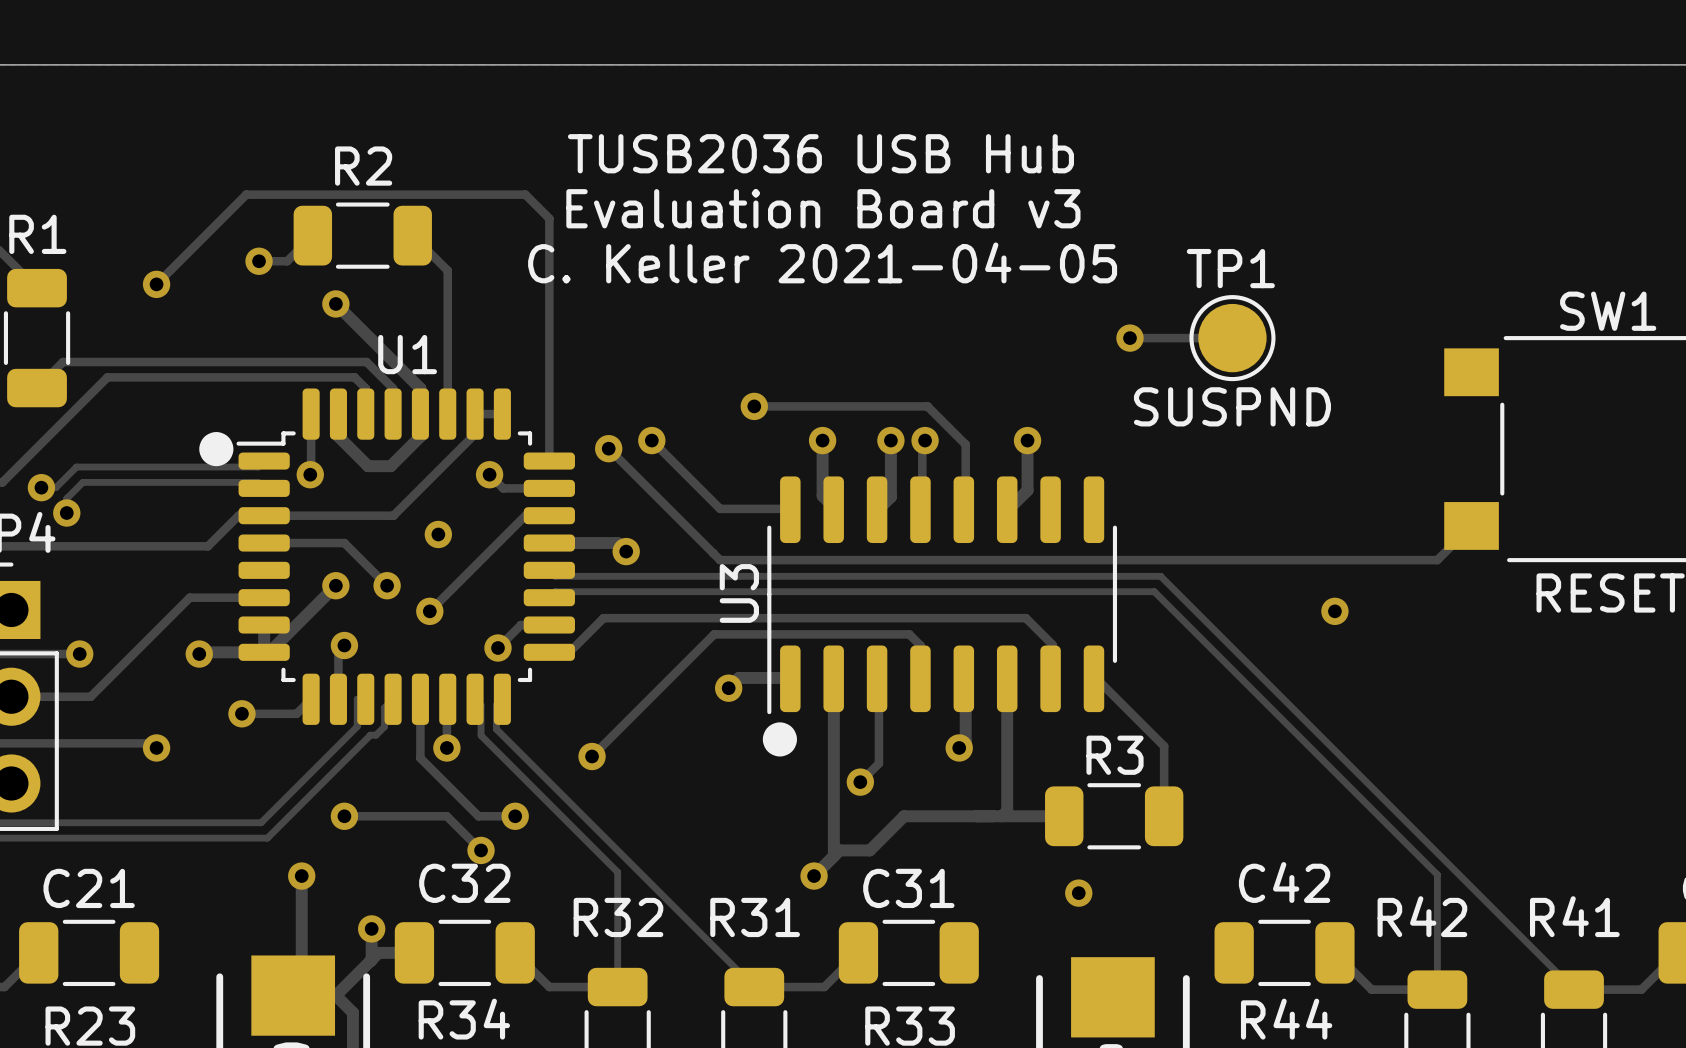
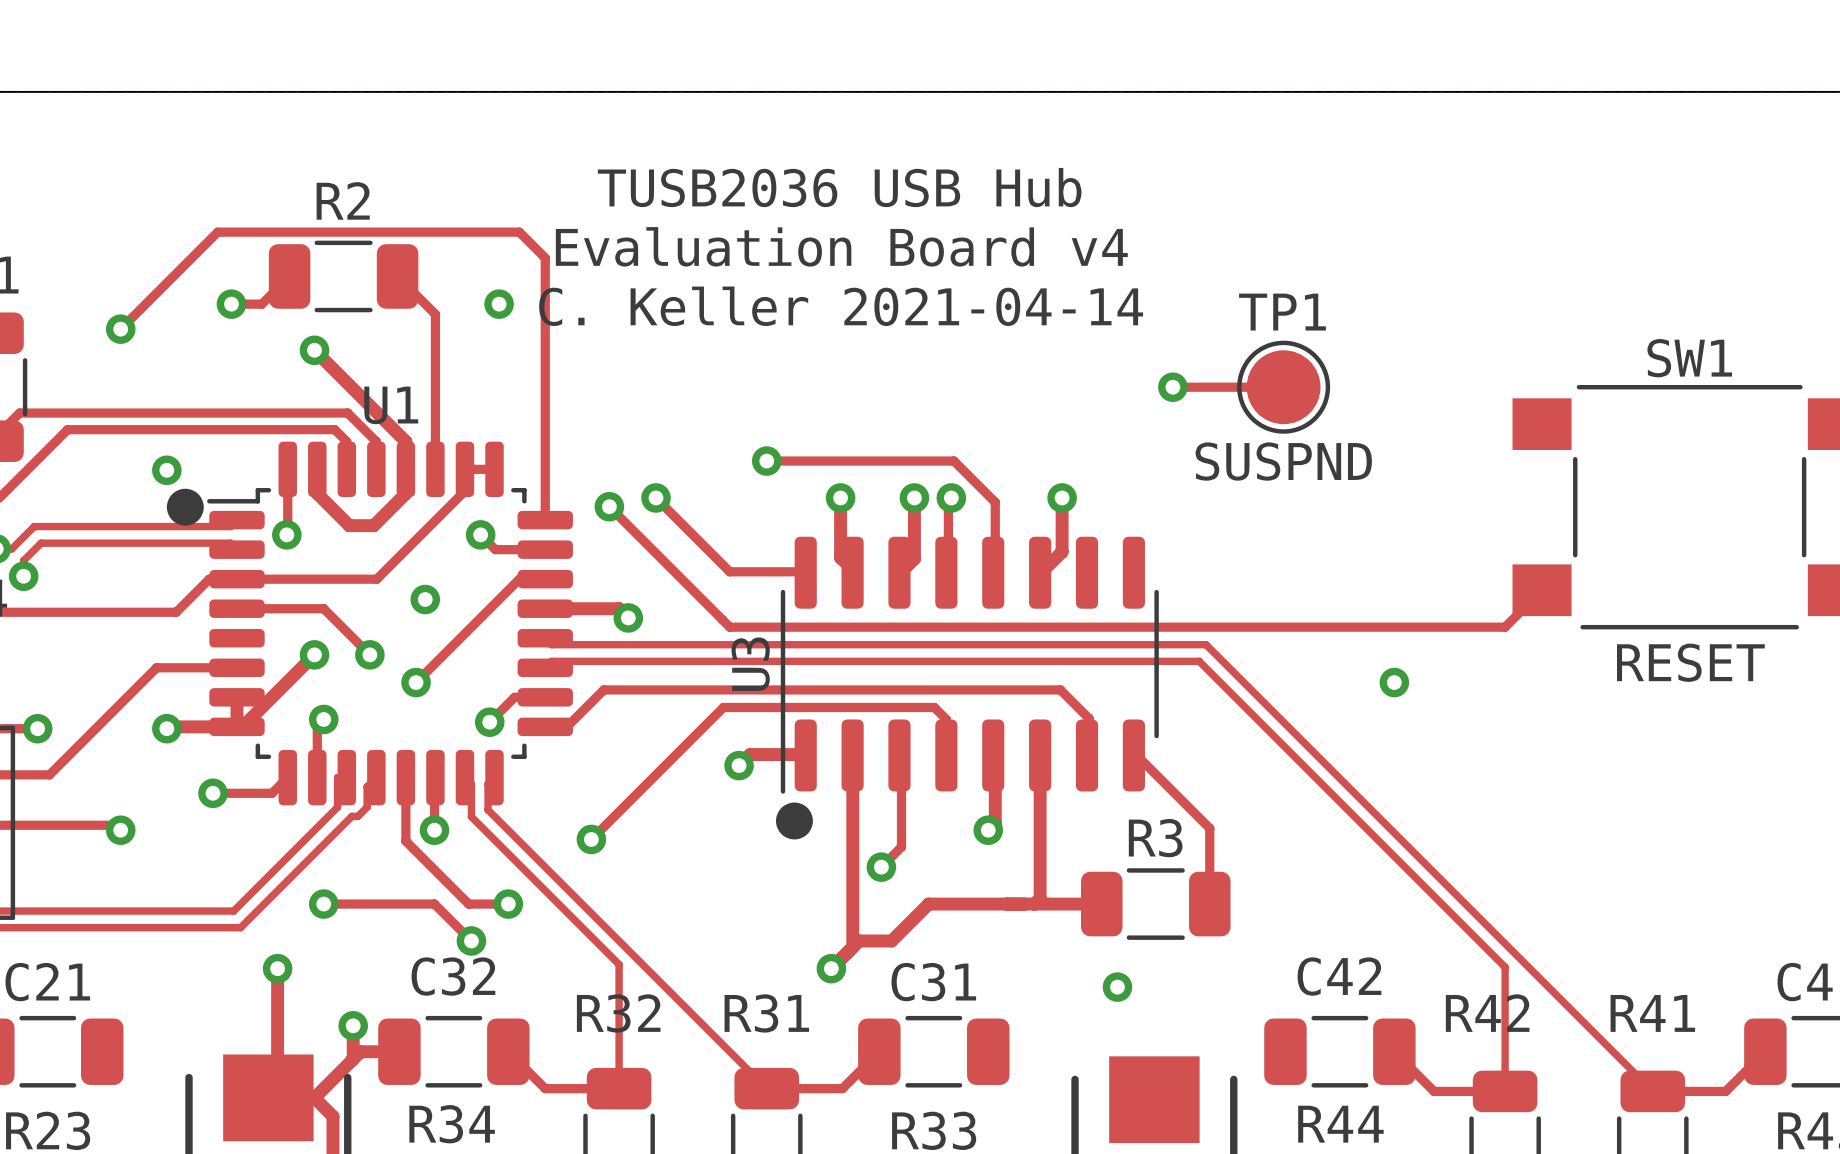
text: Evaluation Board v3 (823, 208) -> Evaluation Board v4 (841, 246)
via: none -> (499, 304)
text: C. Keller 2021-04-05 (822, 262) -> C. Keller 2021-04-14 (841, 306)
via: none -> (166, 470)

